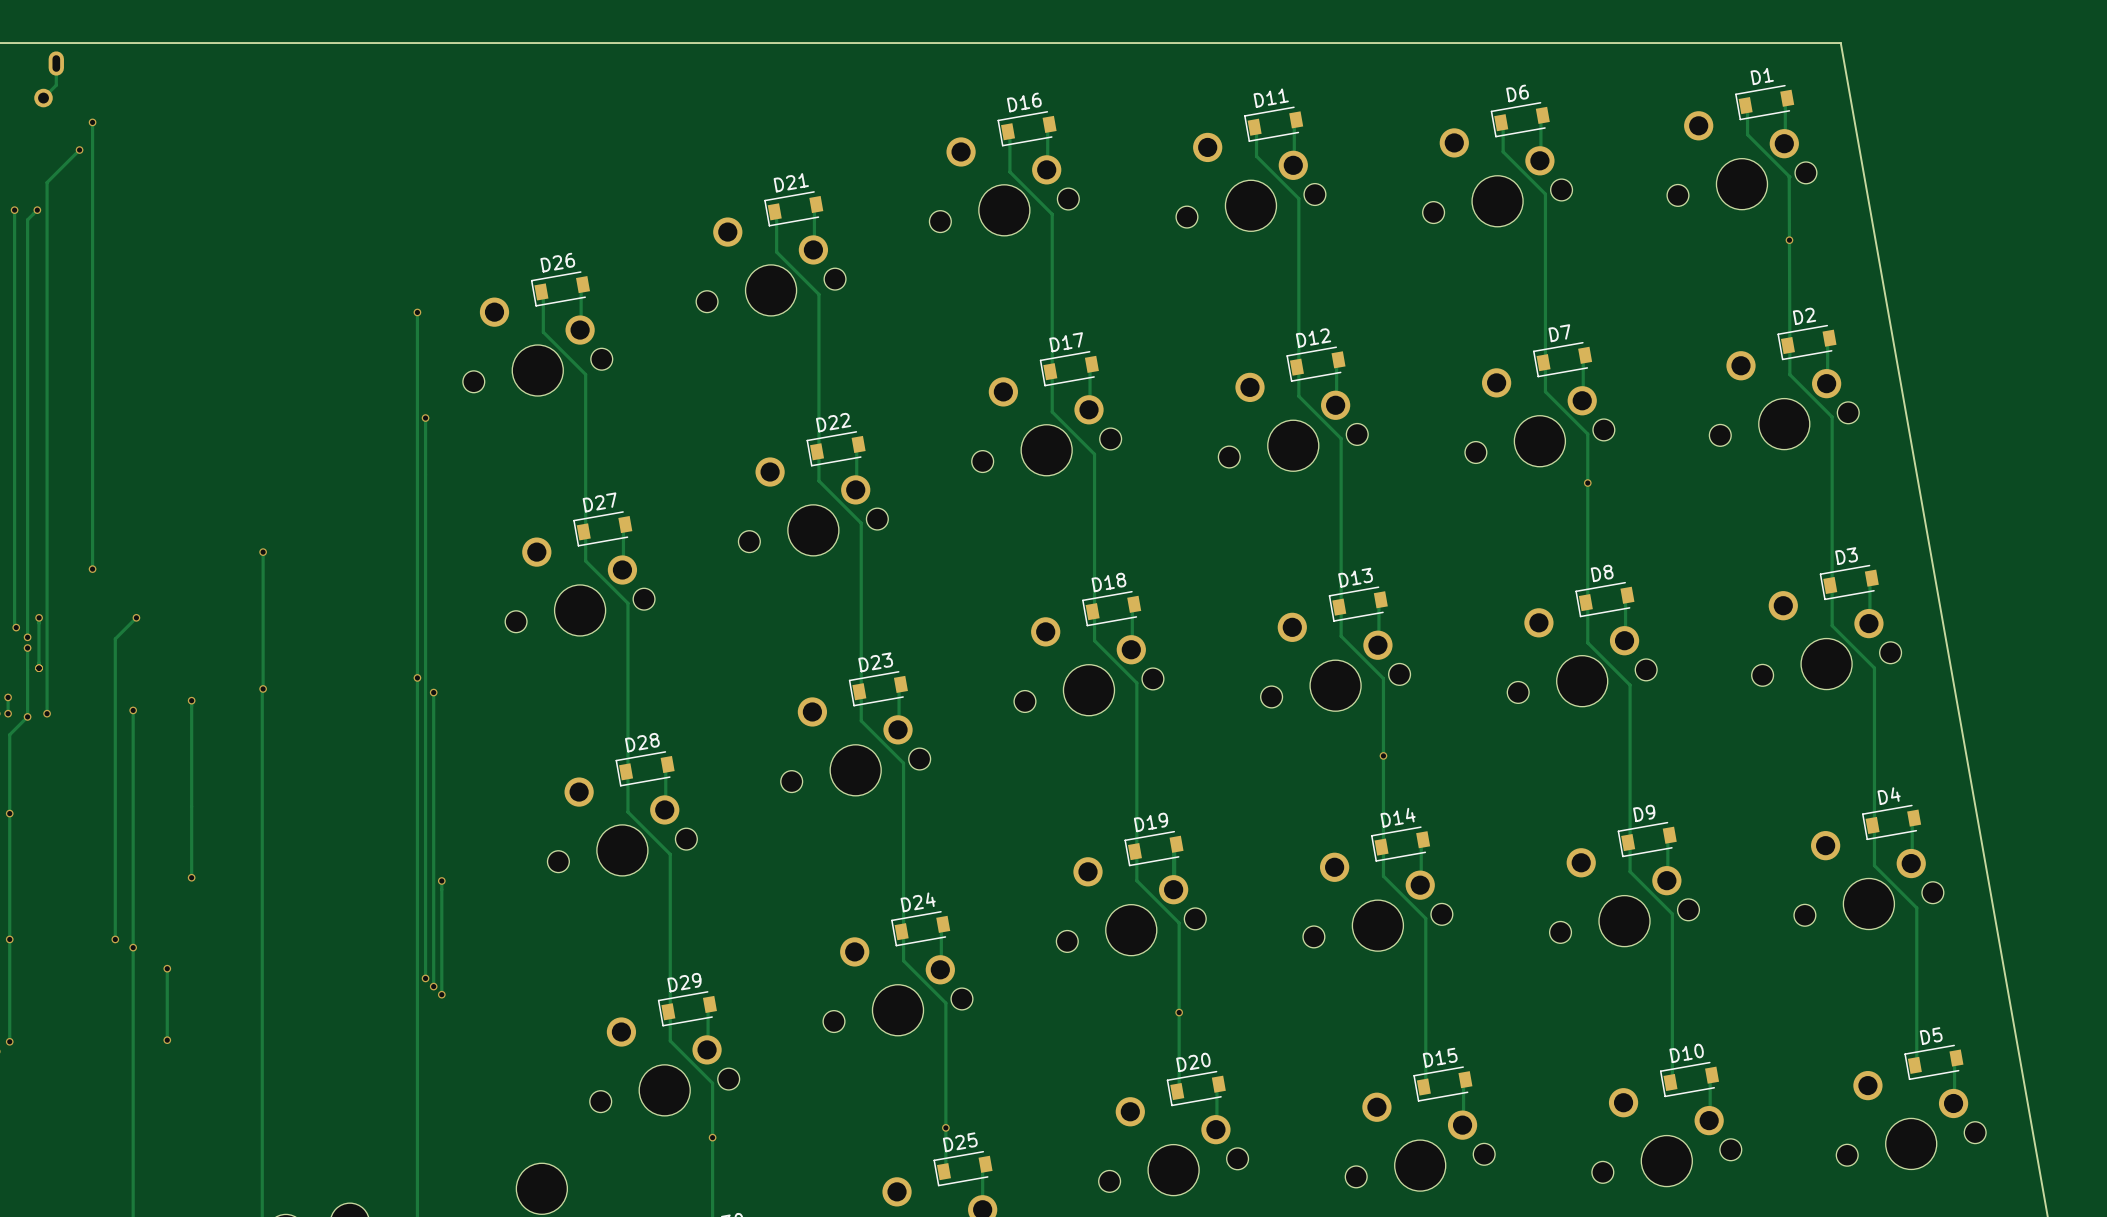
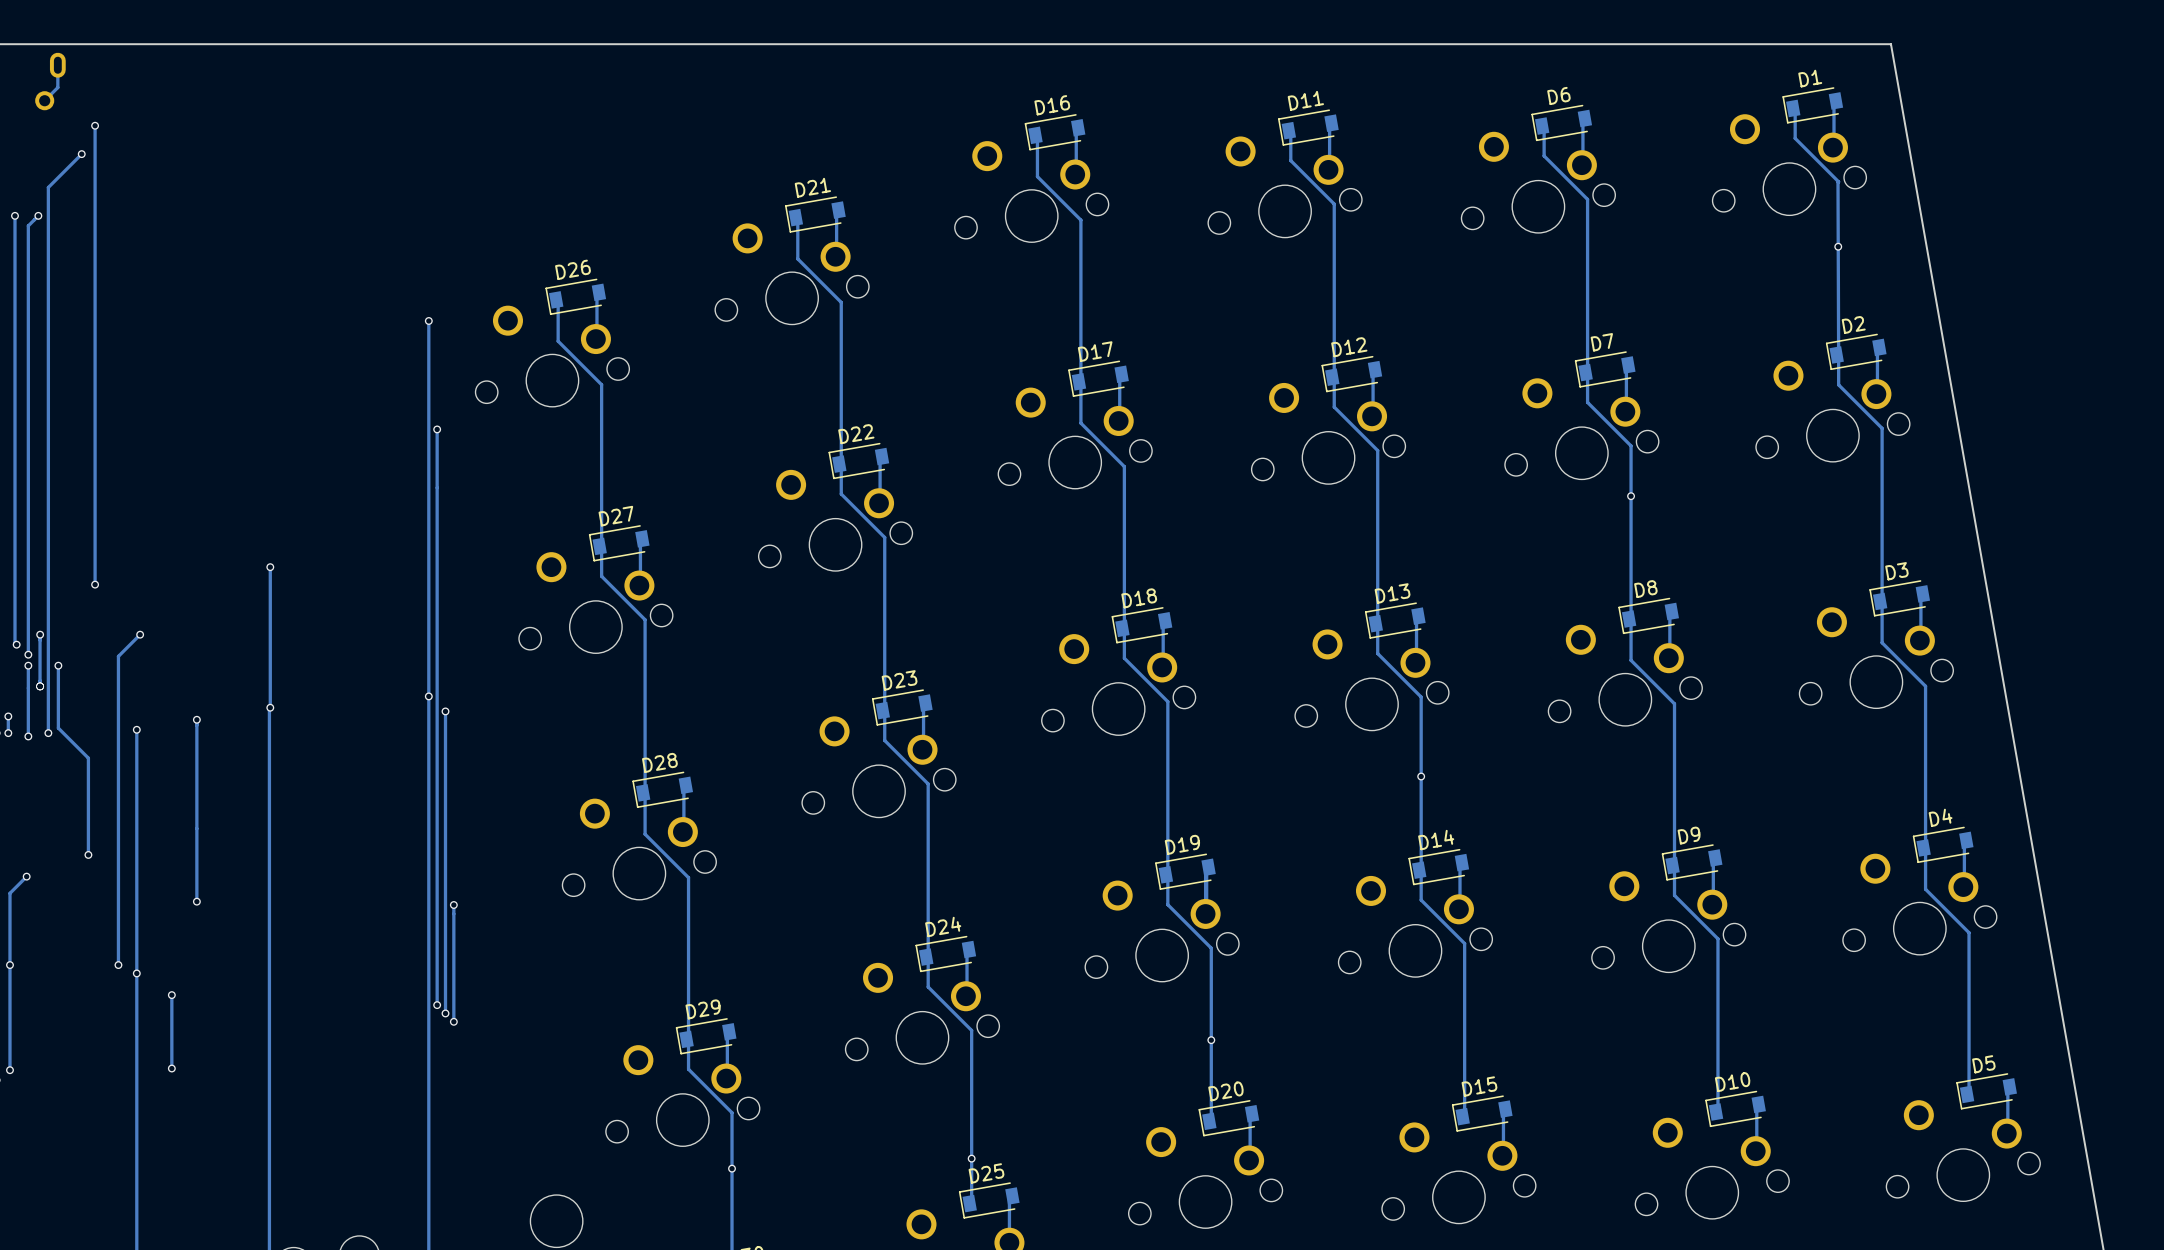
track: none -> (58, 665) (58, 728) (88, 758) (88, 854)
via: none -> (58, 665)
track: (27, 716) (9, 734) (9, 869) -> (26, 876) (9, 893)
via: (9, 813) -> none
via: none -> (88, 854)
via: none -> (26, 876)

